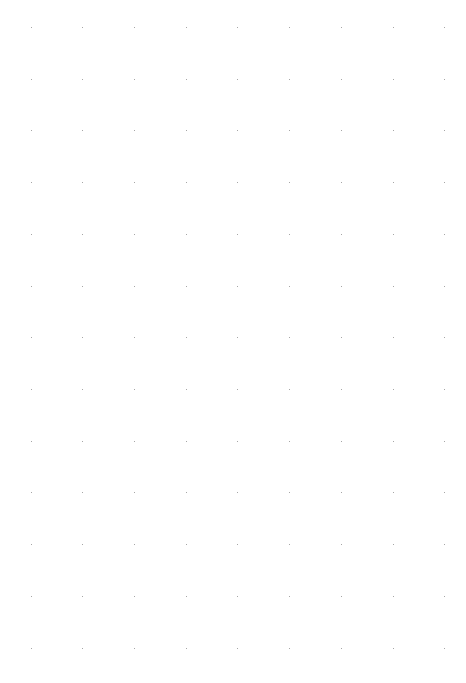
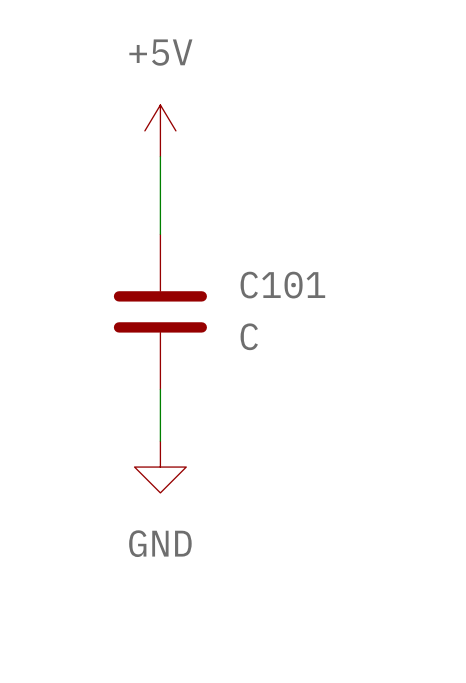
power symbol: none -> +5V (160, 130)
wire: none -> (160, 156) (160, 234)
C101: none -> C (160, 311)
wire: none -> (160, 389) (160, 441)
power symbol: none -> GND (160, 467)

